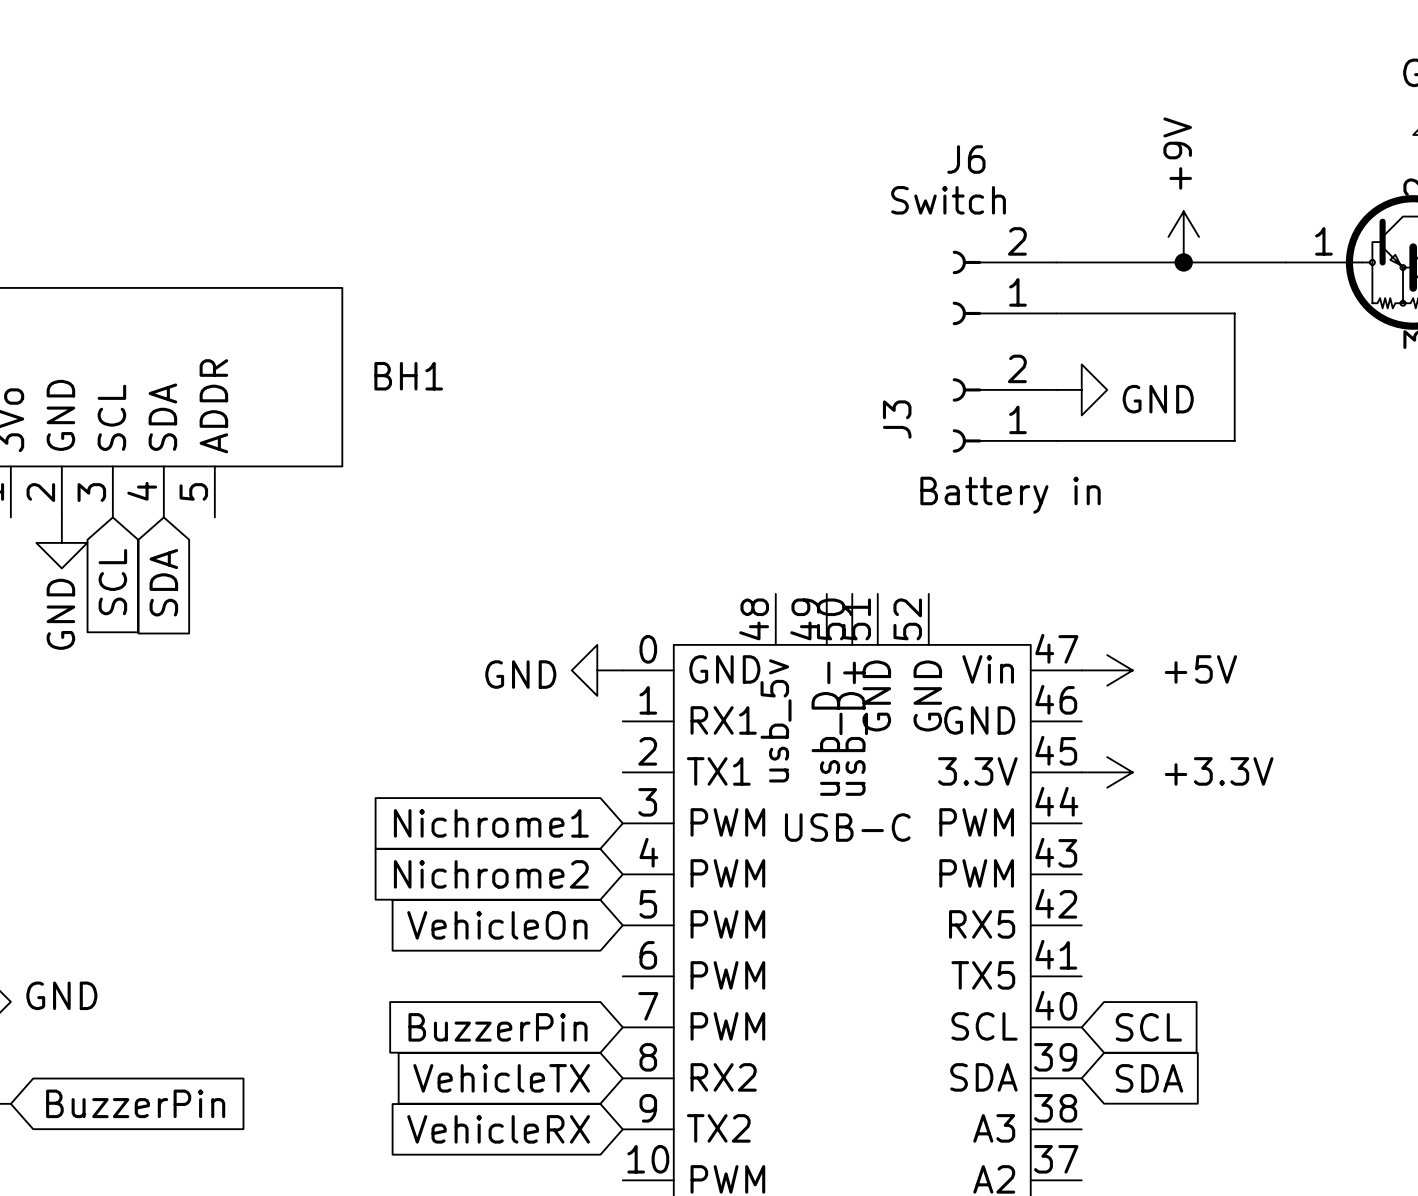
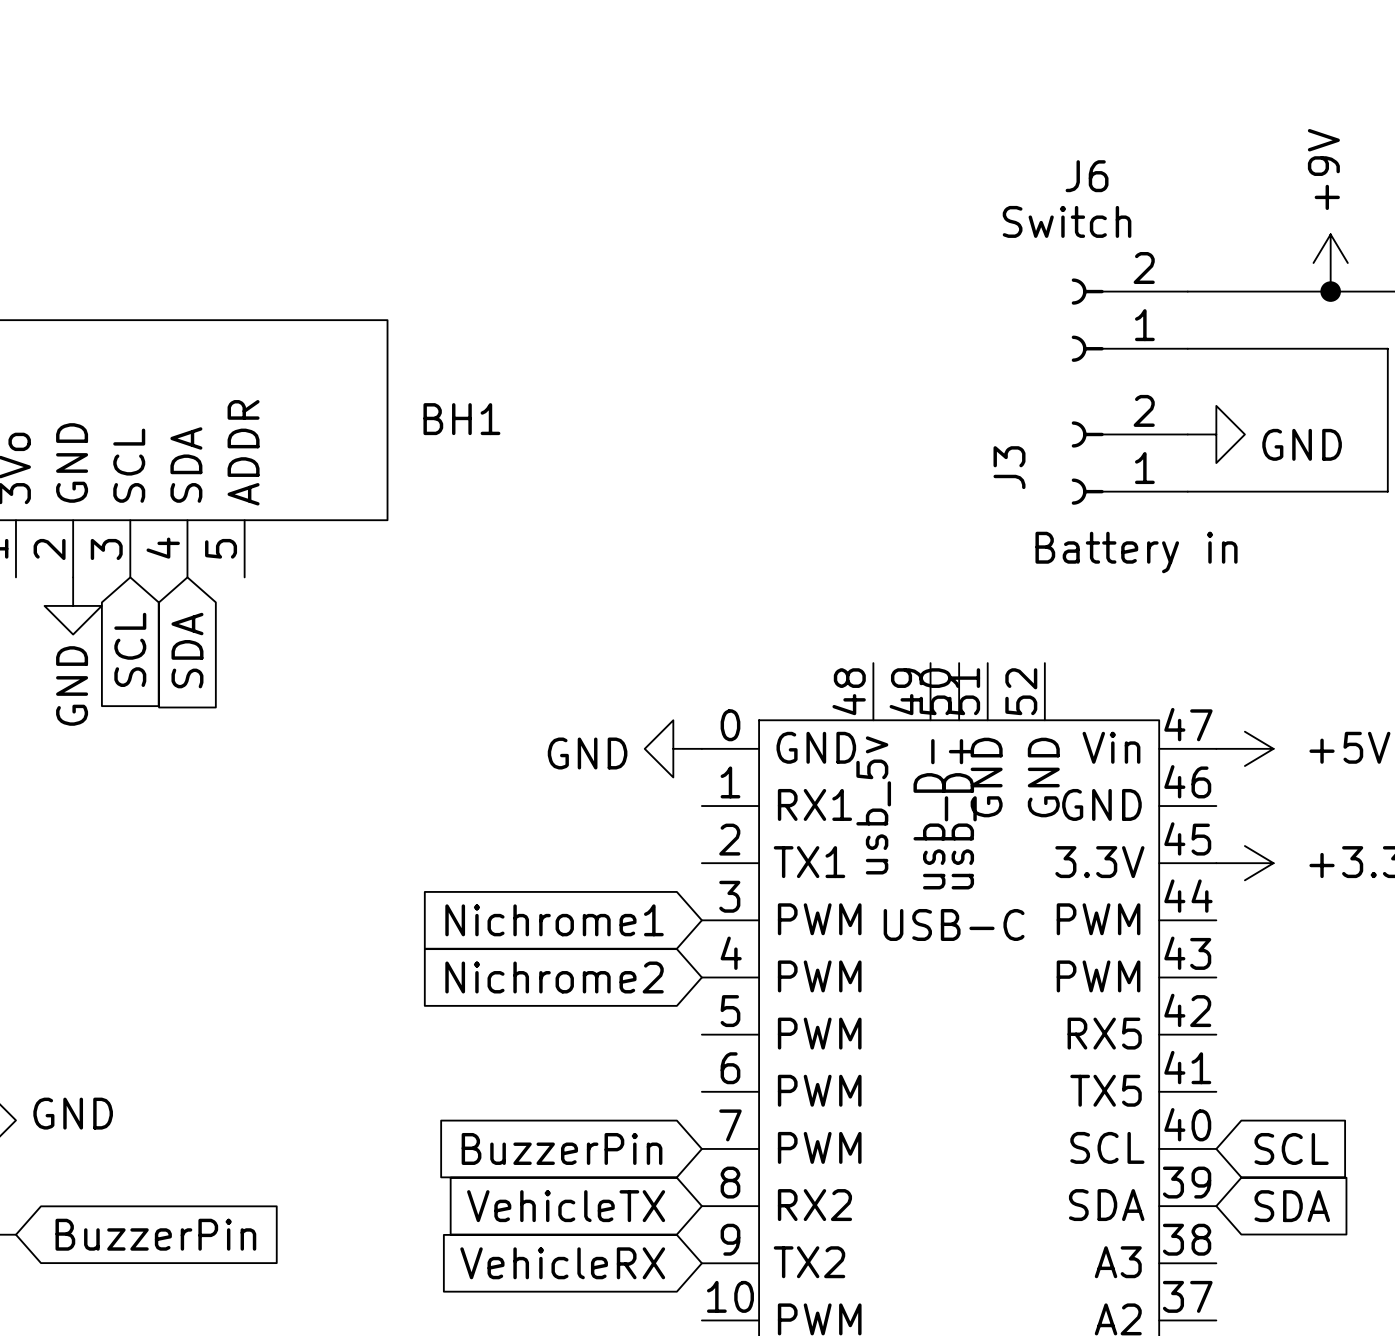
global label: VehicleOn (497, 925) -> none

